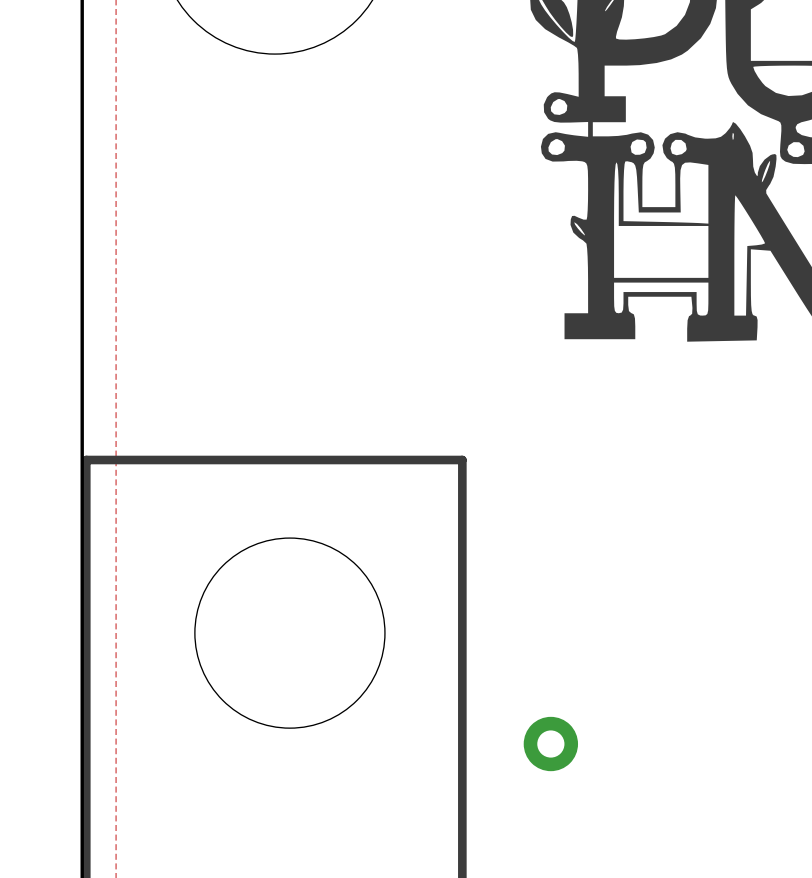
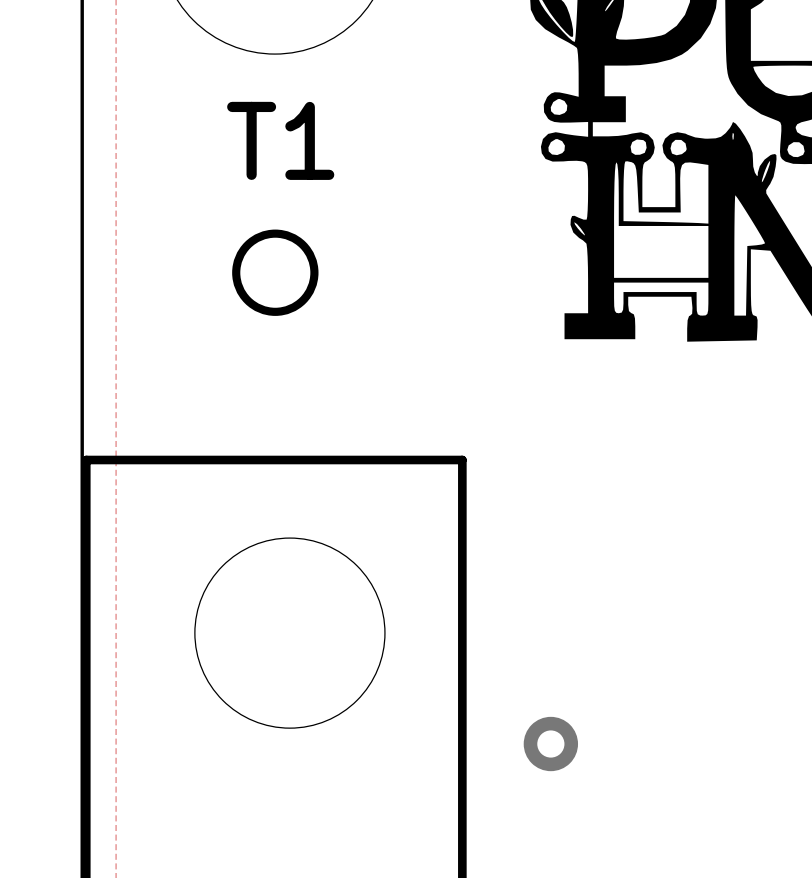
T1: none -> (275, 272)

